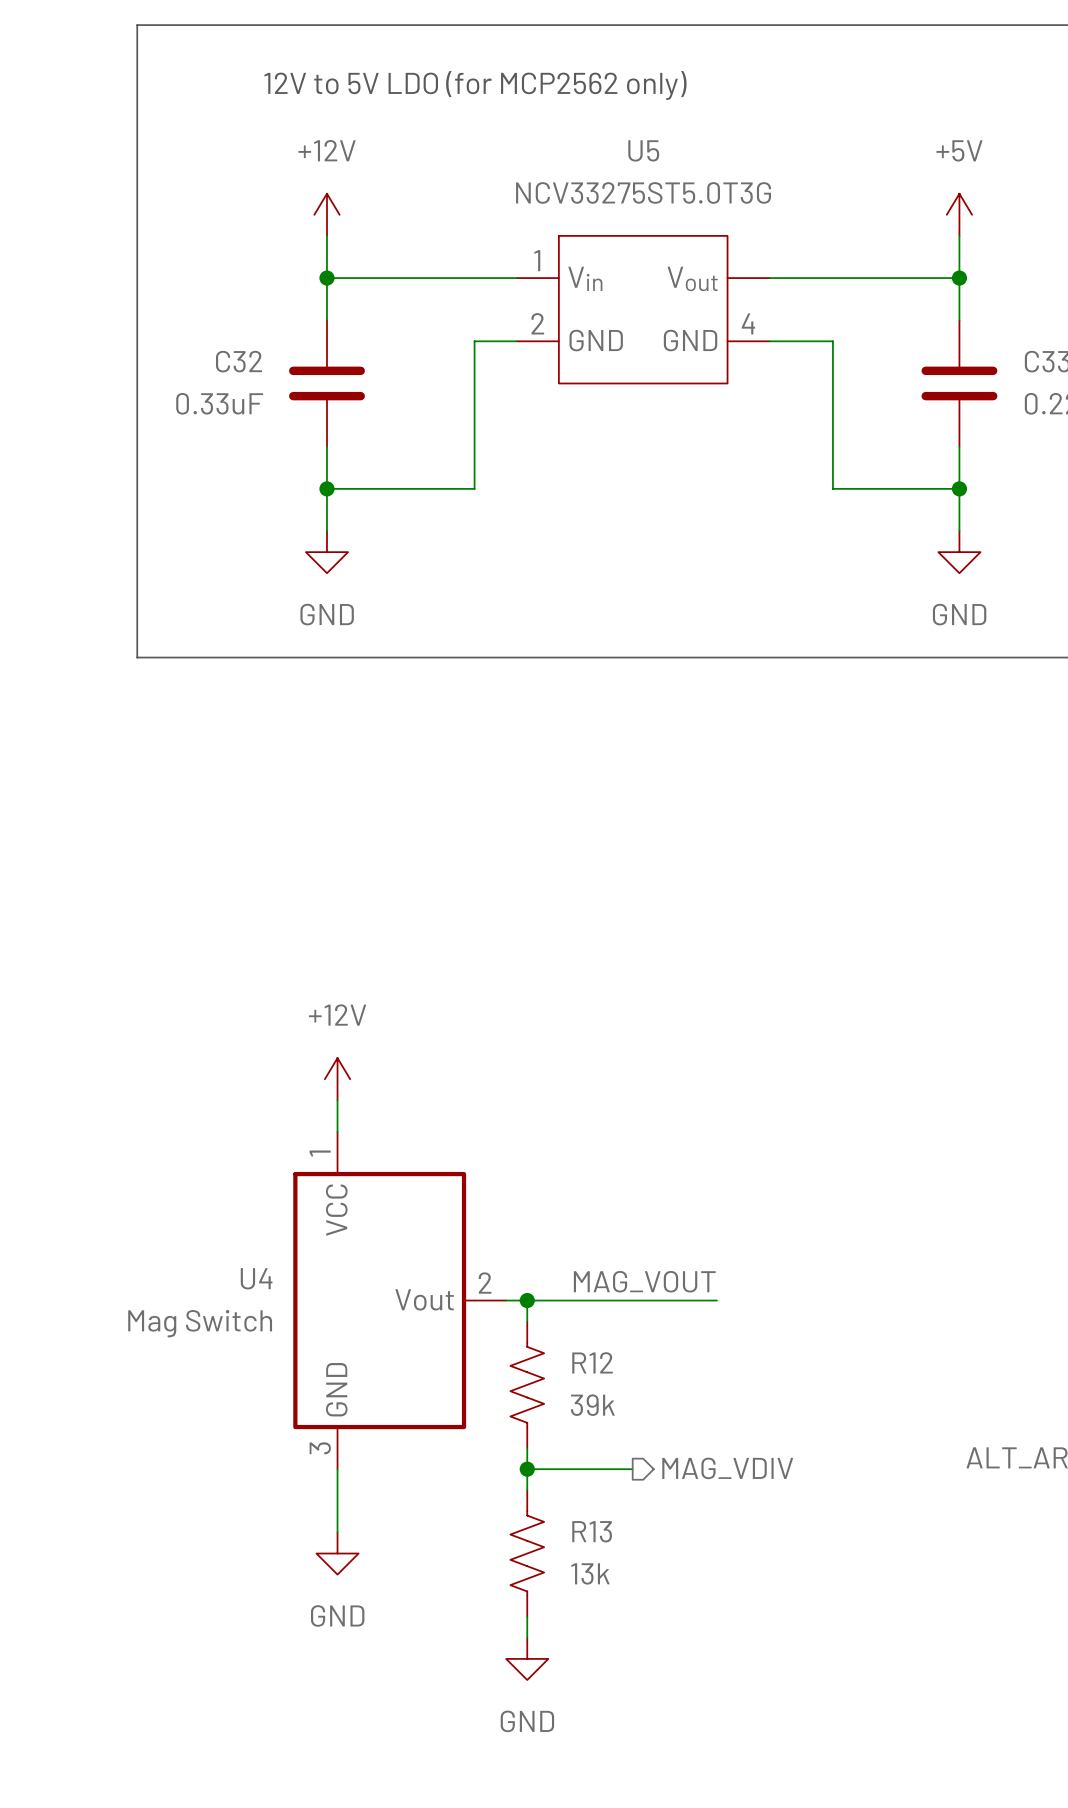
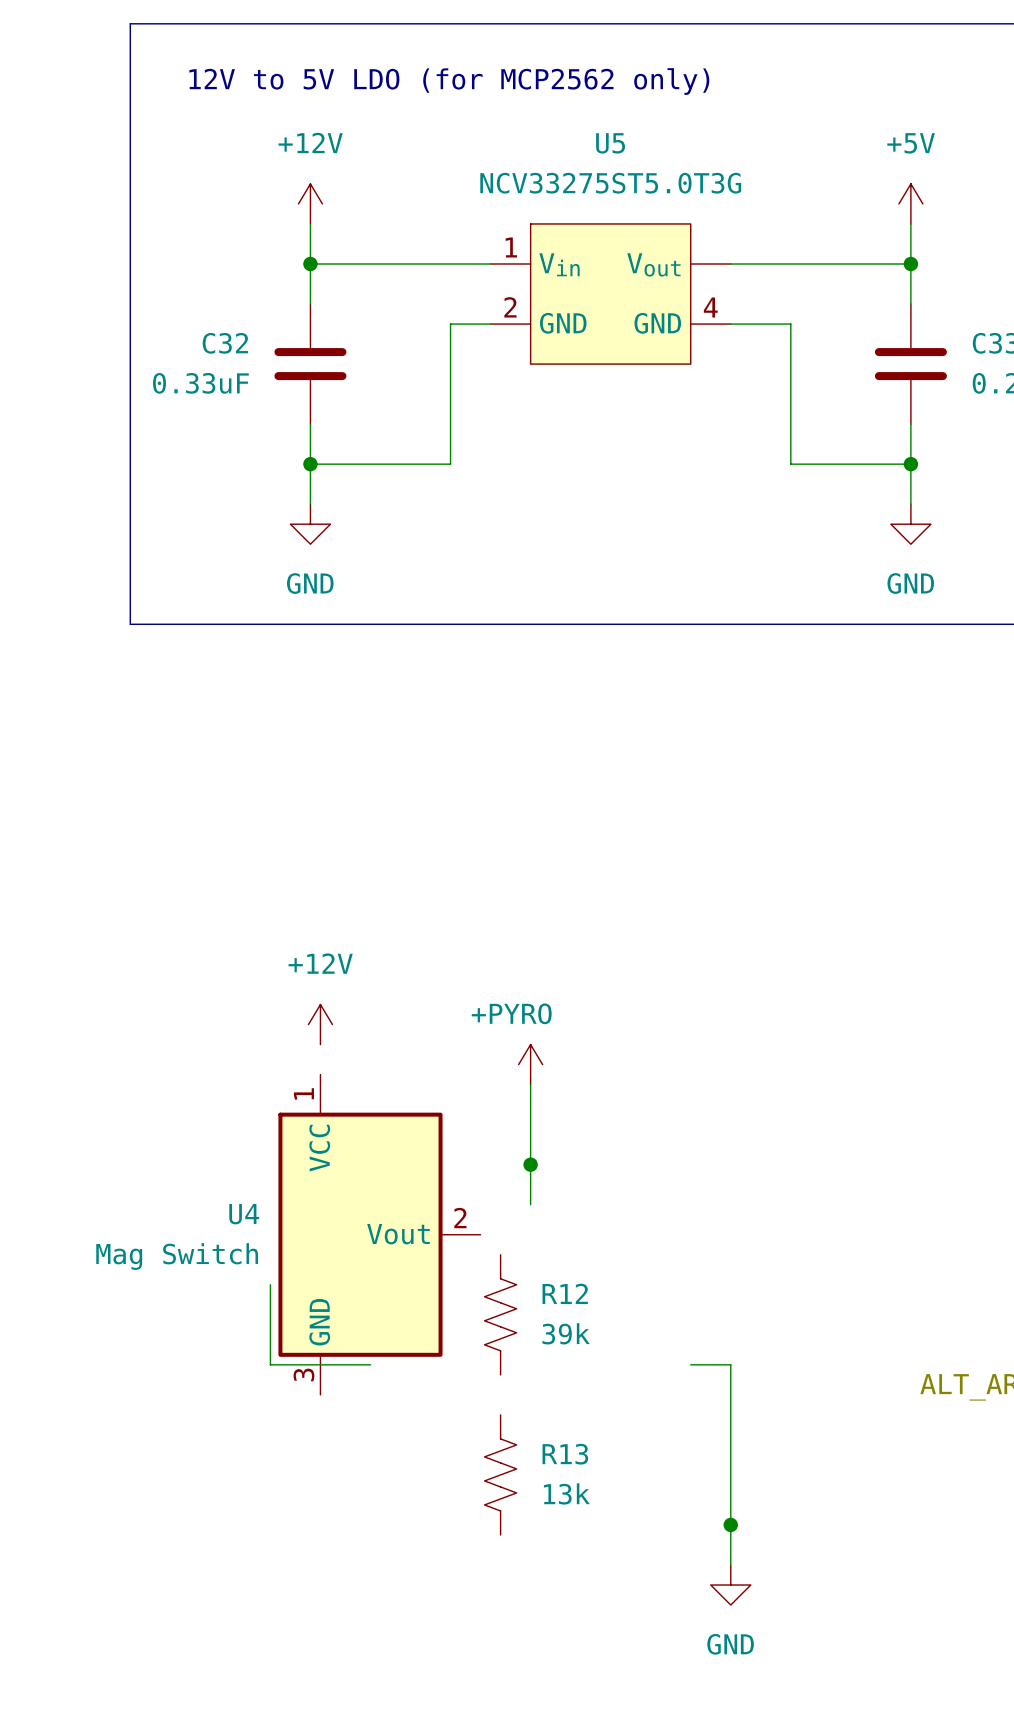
wire: (337, 1100) (337, 1131) -> none
power symbol: none -> +PYRO (530, 1064)
wire: none -> (530, 1084) (530, 1204)
label: MAG_VOUT (644, 1281) -> none
wire: (506, 1300) (717, 1300) -> none
wire: (527, 1300) (527, 1321) -> none
junction position: (527, 1300) -> (530, 1164)
wire: none -> (270, 1284) (270, 1364) (370, 1364)
wire: none -> (690, 1364) (730, 1364) (730, 1564)
wire: (527, 1448) (527, 1490) -> none
hierarchical label: MAG_VDIV (727, 1468) -> none
wire: (337, 1469) (337, 1532) -> none
wire: (527, 1469) (632, 1469) -> none
junction: (527, 1469) -> none
power symbol: GND (337, 1553) -> none
junction: none -> (730, 1524)
wire: (527, 1616) (527, 1637) -> none
power symbol: GND (527, 1658) -> none
power symbol: none -> GND (730, 1585)

